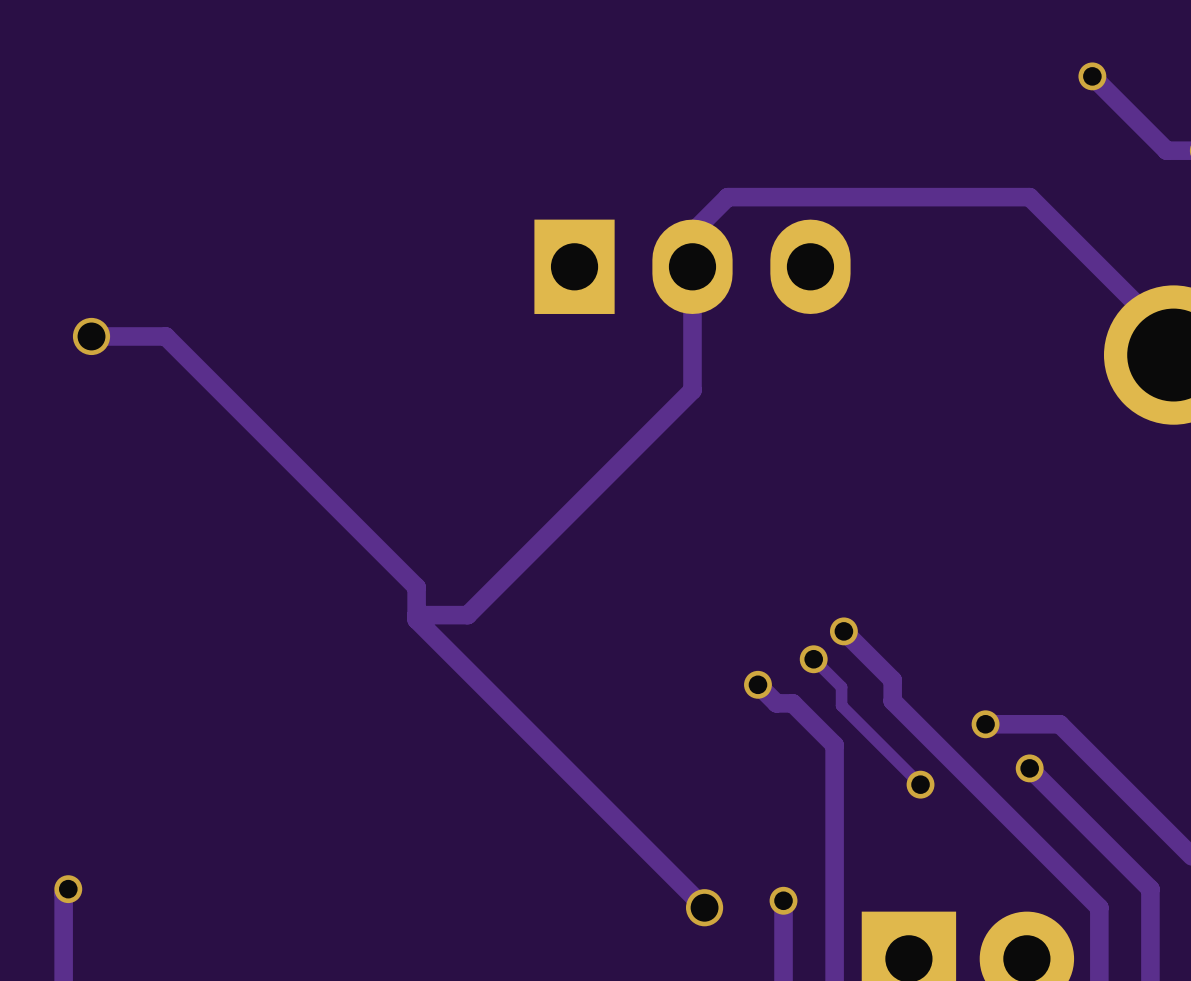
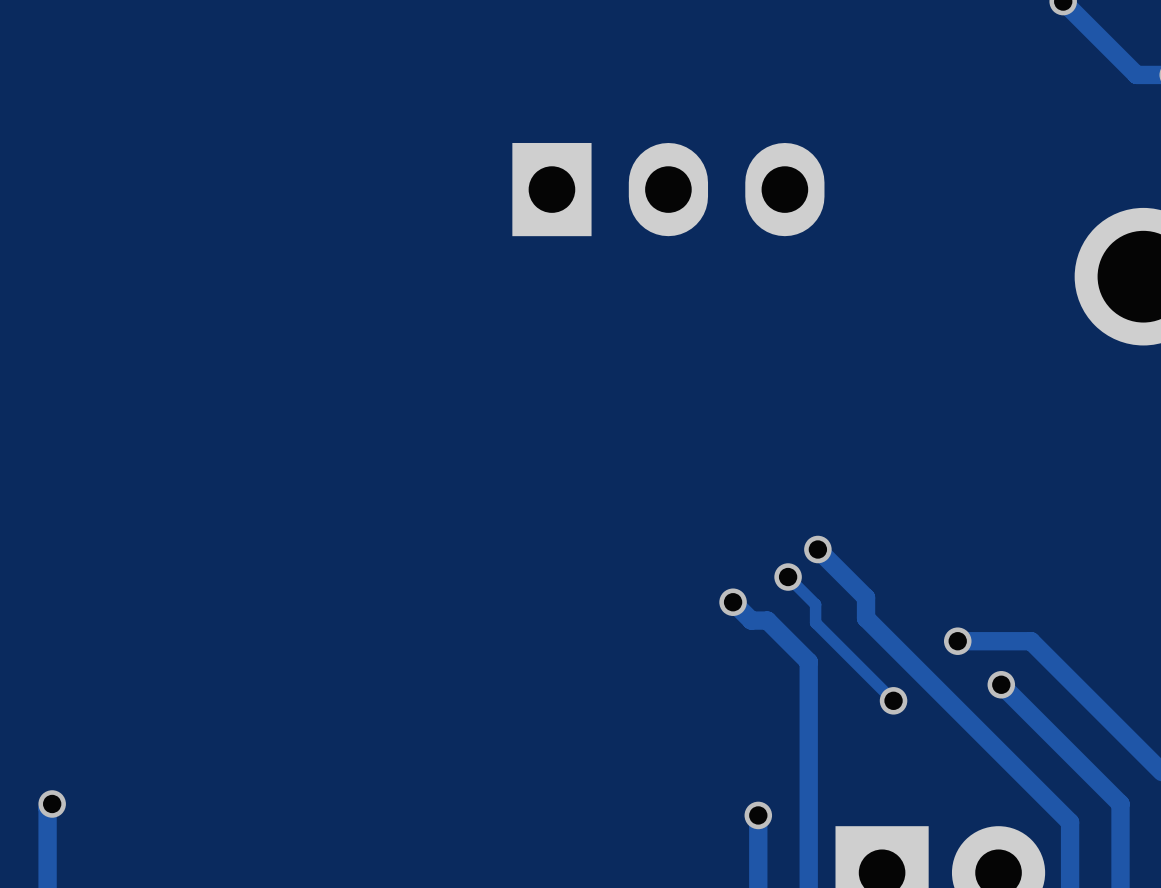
track: (91, 336) (165, 336) (416, 587) (416, 619) (704, 907) -> none
via: (91, 336) -> none
track: (1173, 355) (1173, 341) (1029, 197) (727, 197) (692, 232) (692, 390) (467, 615) (416, 615) -> none
via: (704, 907) -> none

